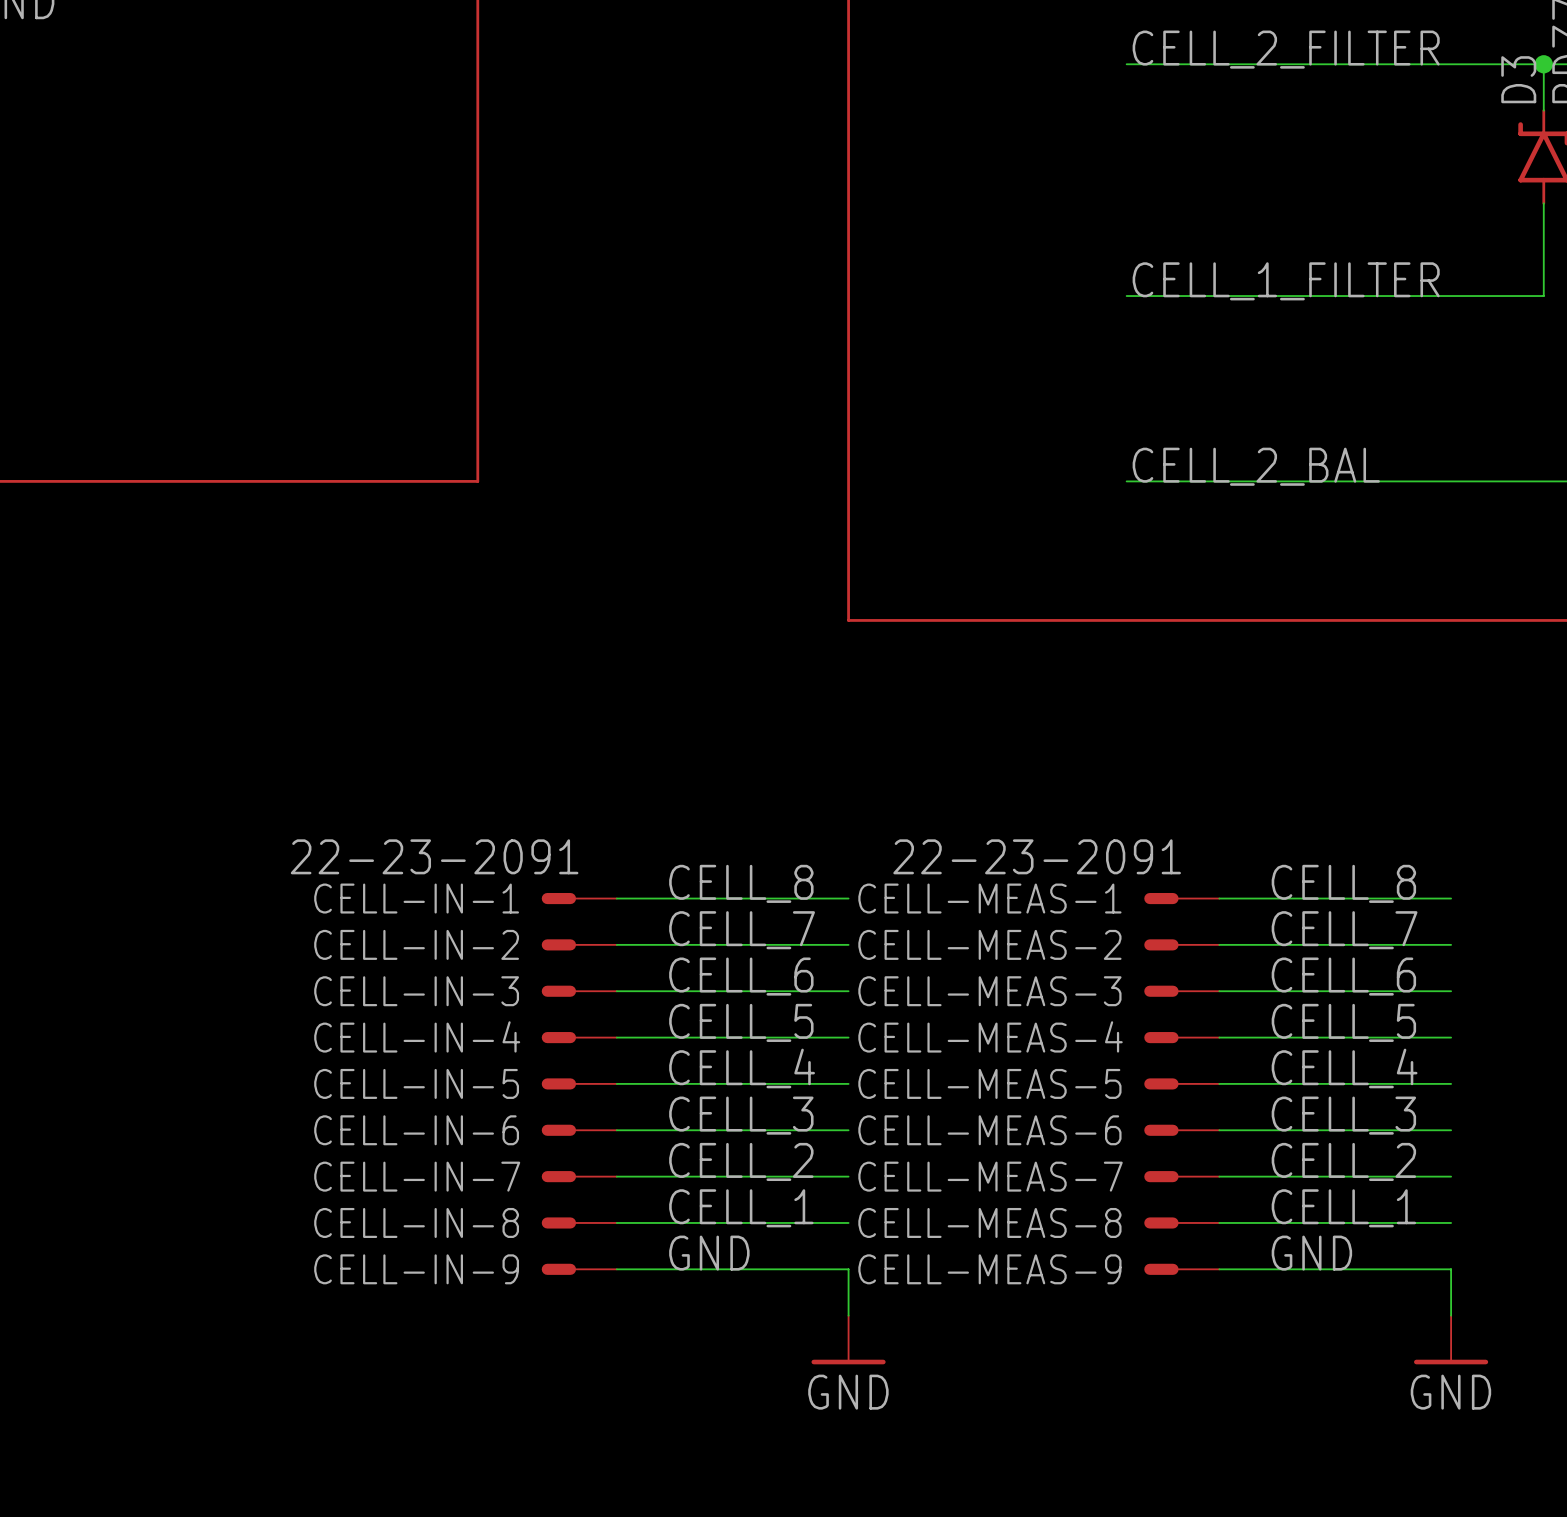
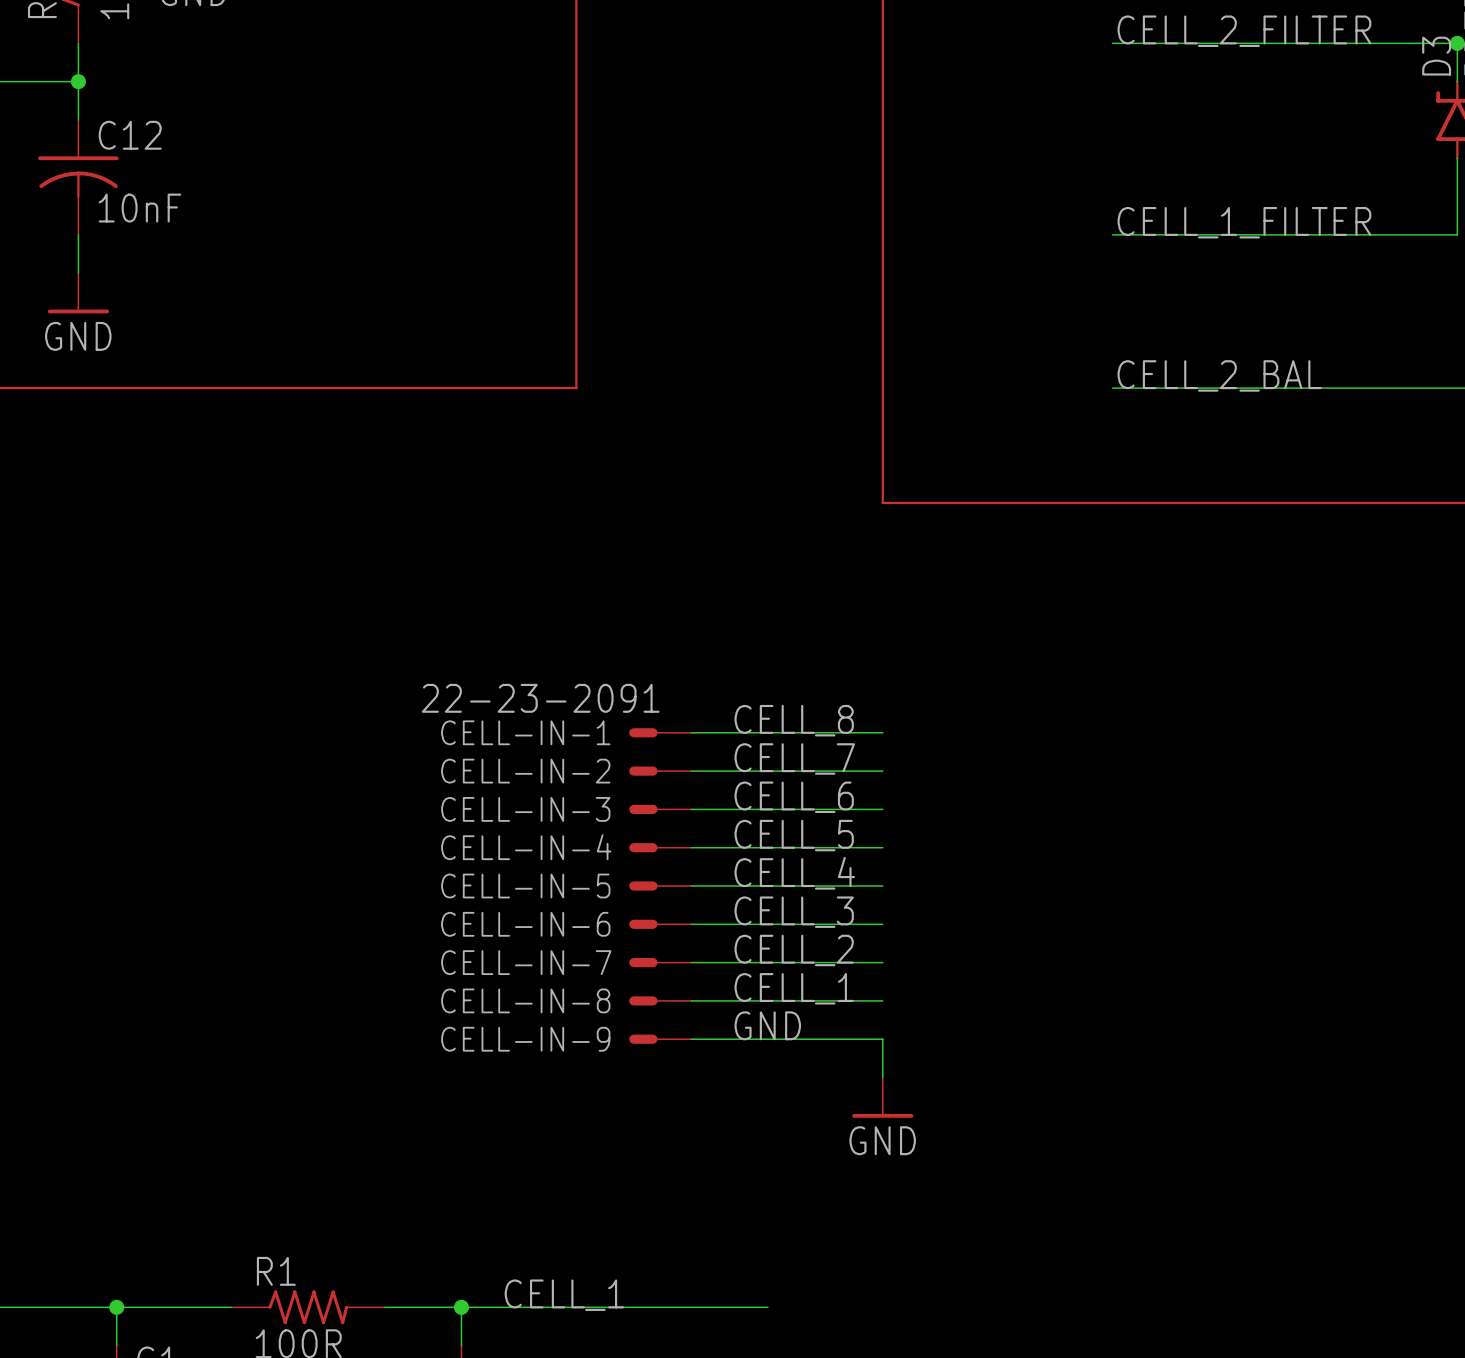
label: CELL_8 (1343, 883) -> none
CELL-MEAS-1: 22-23-2091 (1181, 898) -> none
wire: (1219, 898) (1451, 898) -> none
label: CELL_7 (1344, 930) -> none
CELL-MEAS-2: (1181, 944) -> none
wire: (1219, 944) (1451, 944) -> none
label: CELL_6 (1343, 976) -> none
CELL-MEAS-3: (1181, 991) -> none
wire: (1219, 991) (1451, 991) -> none
label: CELL_5 (1343, 1022) -> none
CELL-MEAS-4: (1181, 1037) -> none
wire: (1219, 1037) (1451, 1037) -> none
label: CELL_4 (1344, 1068) -> none
CELL-MEAS-5: (1181, 1083) -> none
wire: (1219, 1083) (1451, 1083) -> none
label: CELL_3 (1343, 1115) -> none
CELL-MEAS-6: (1181, 1130) -> none
wire: (1219, 1130) (1451, 1130) -> none
label: CELL_2 (1343, 1161) -> none
CELL-MEAS-7: (1181, 1176) -> none
wire: (1219, 1176) (1451, 1176) -> none
label: CELL_1 (1343, 1208) -> none
CELL-MEAS-8: (1181, 1222) -> none
wire: (1219, 1222) (1451, 1222) -> none
label: GND (1311, 1253) -> none
CELL-MEAS-9: (1181, 1269) -> none
wire: (1219, 1269) (1451, 1269) (1451, 1315) -> none
power symbol: GND (1451, 1340) -> none

